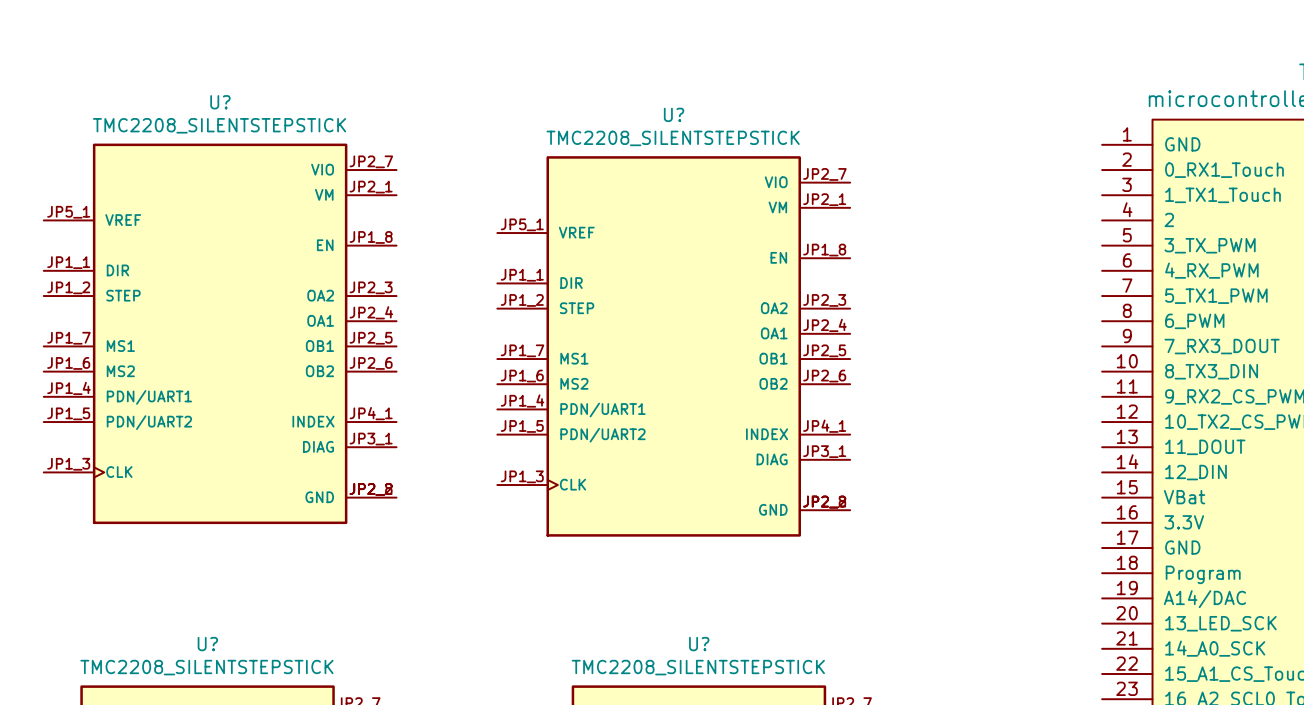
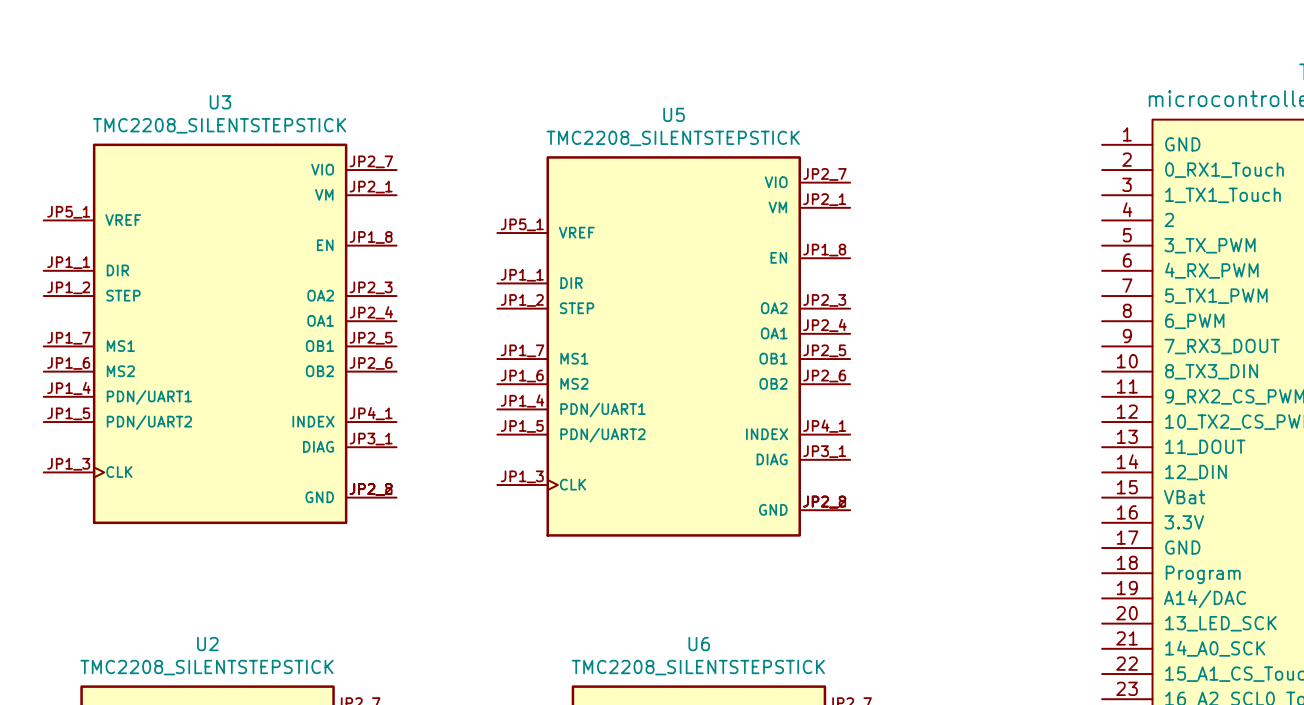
U? name: U? (220, 102) -> U3 (220, 102)
U? name: U? (674, 114) -> U5 (674, 114)
U? name: U? (207, 644) -> U2 (207, 644)
U? name: U? (699, 644) -> U6 (699, 644)

